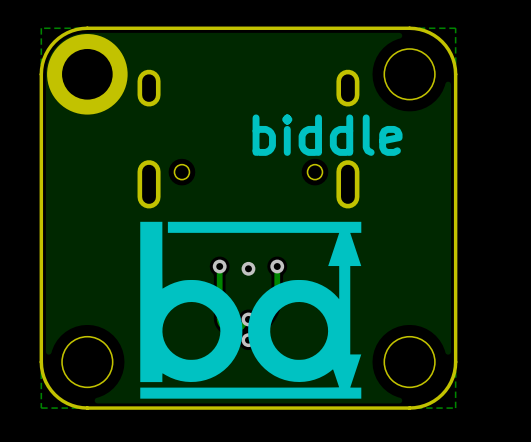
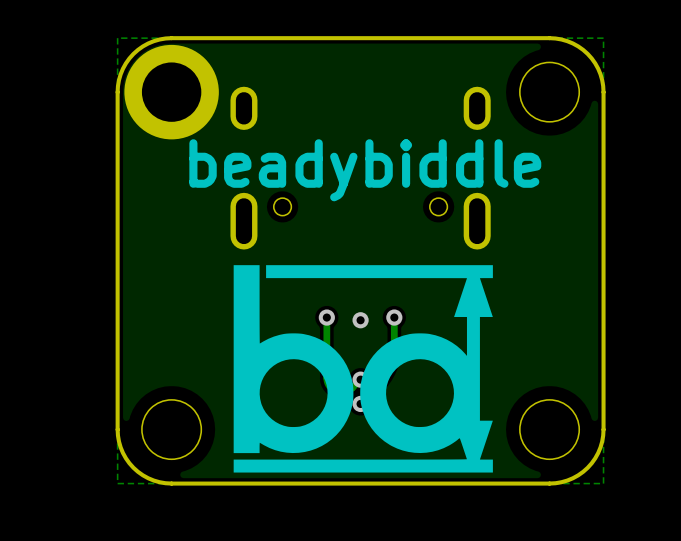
text: none -> beady (273, 170)

